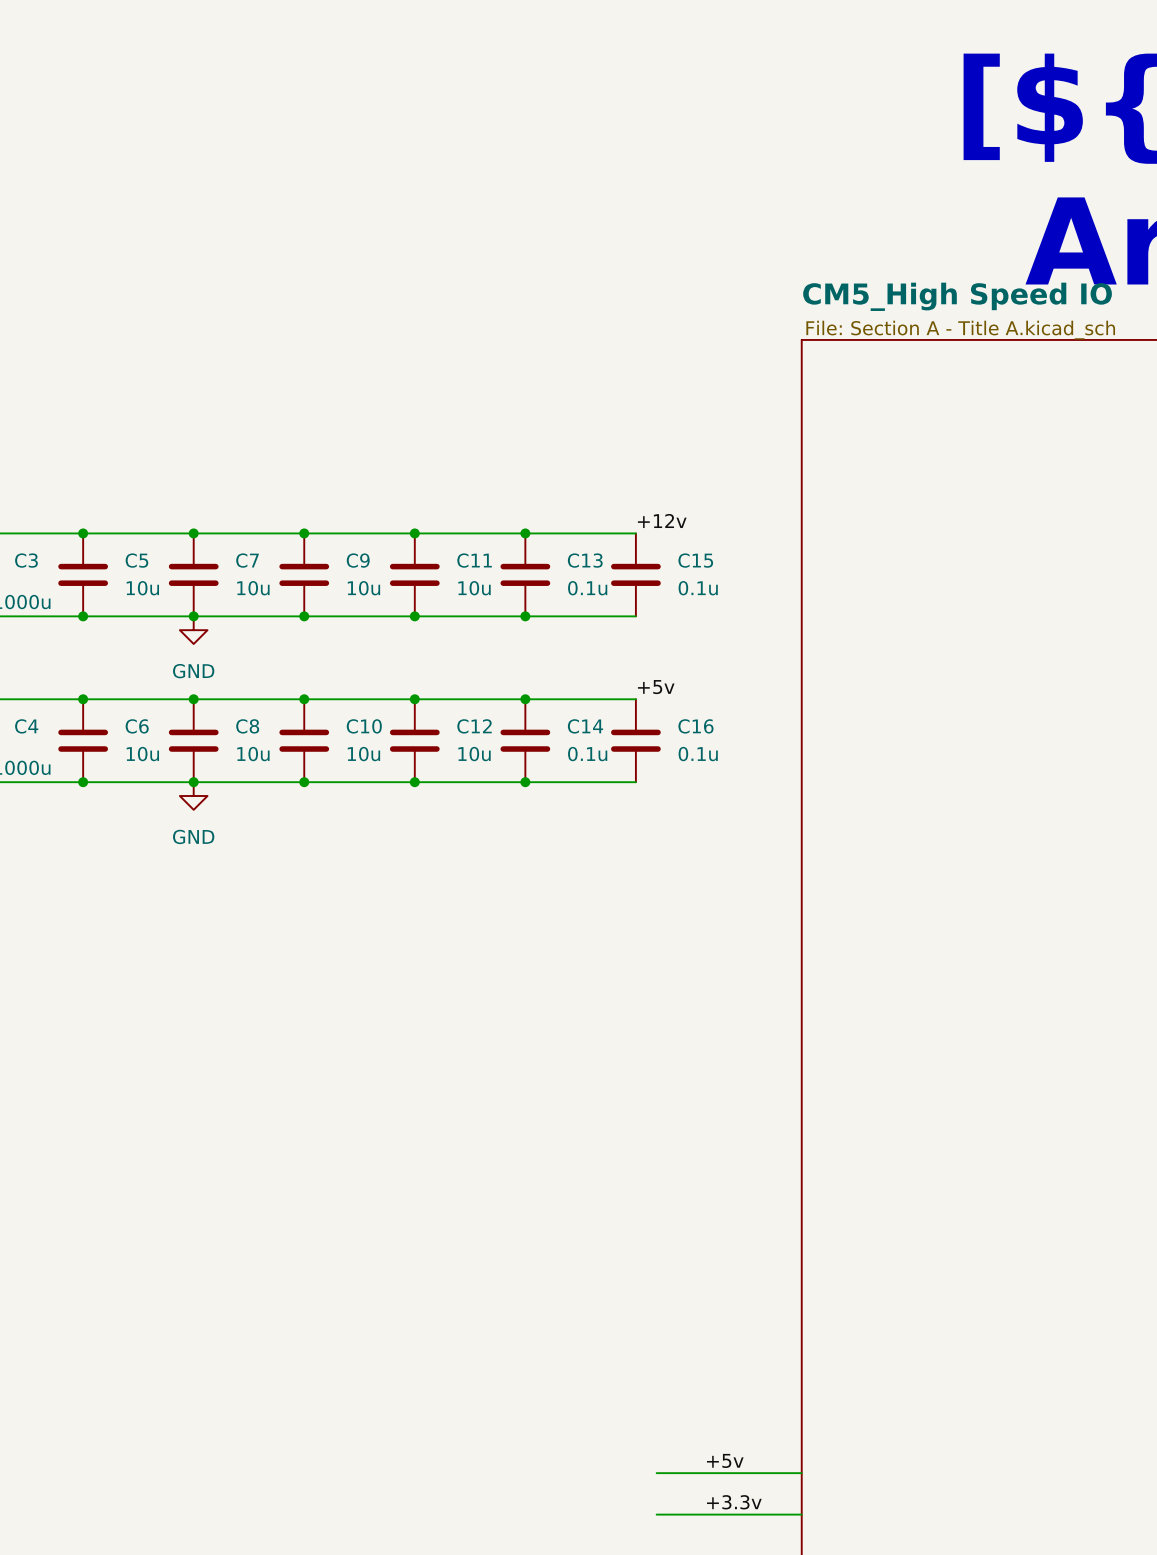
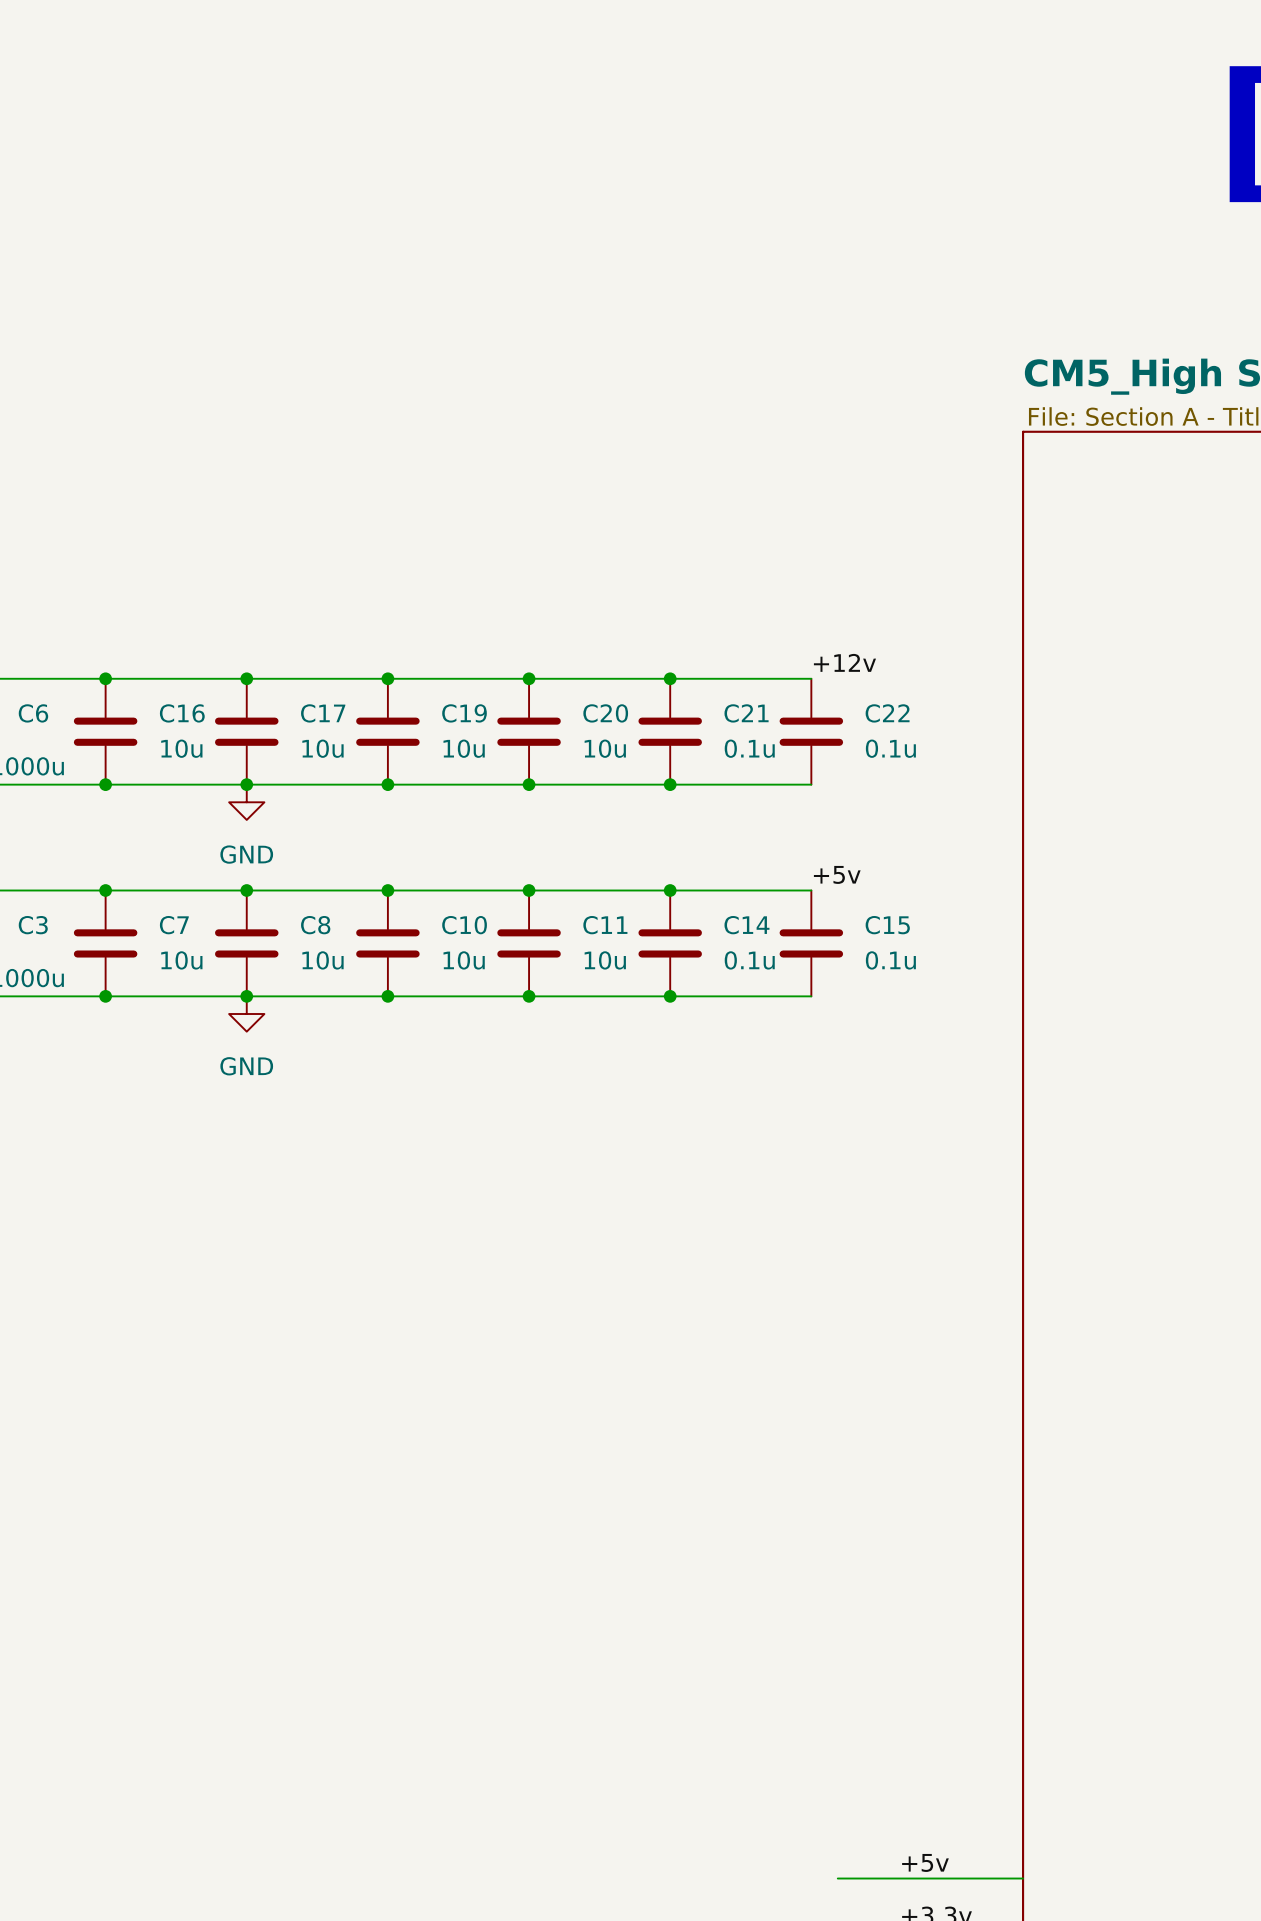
C3 name: C3 (26, 560) -> C6 (33, 713)
C5 name: C5 (136, 560) -> C16 (182, 713)
C7 name: C7 (247, 560) -> C17 (323, 713)
C9 name: C9 (358, 560) -> C19 (464, 713)
C11 name: C11 (474, 560) -> C20 (605, 713)
C13 name: C13 (585, 560) -> C21 (746, 713)
C15 name: C15 (695, 560) -> C22 (887, 713)
C4 name: C4 (26, 726) -> C3 (33, 925)
C6 name: C6 (137, 726) -> C7 (174, 925)
C12 name: C12 (474, 726) -> C11 (605, 925)
C16 name: C16 (695, 726) -> C15 (887, 925)

